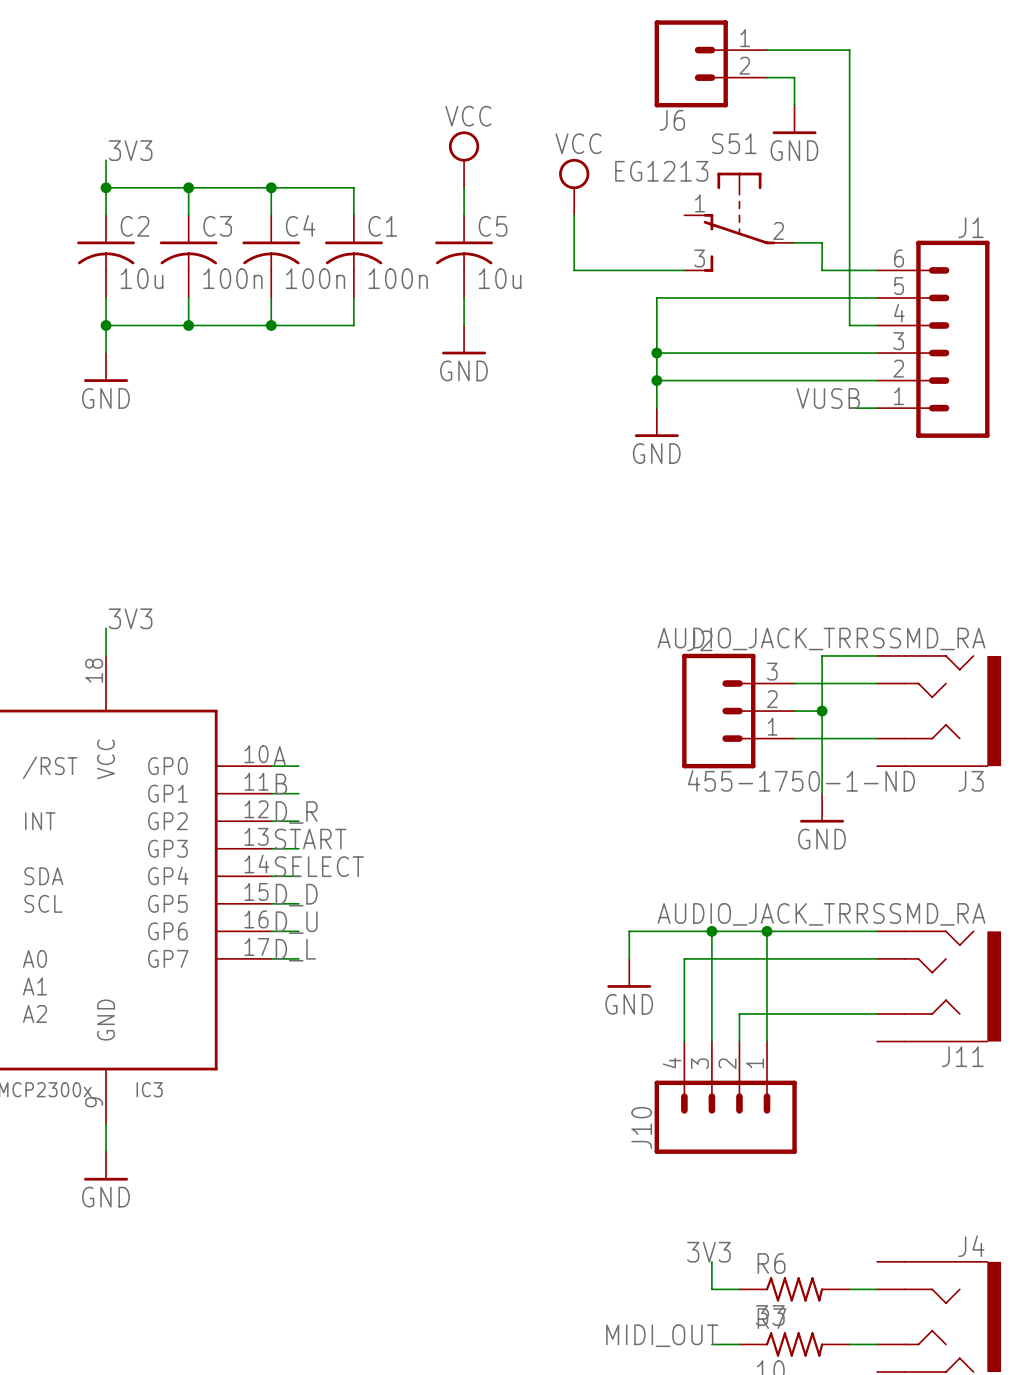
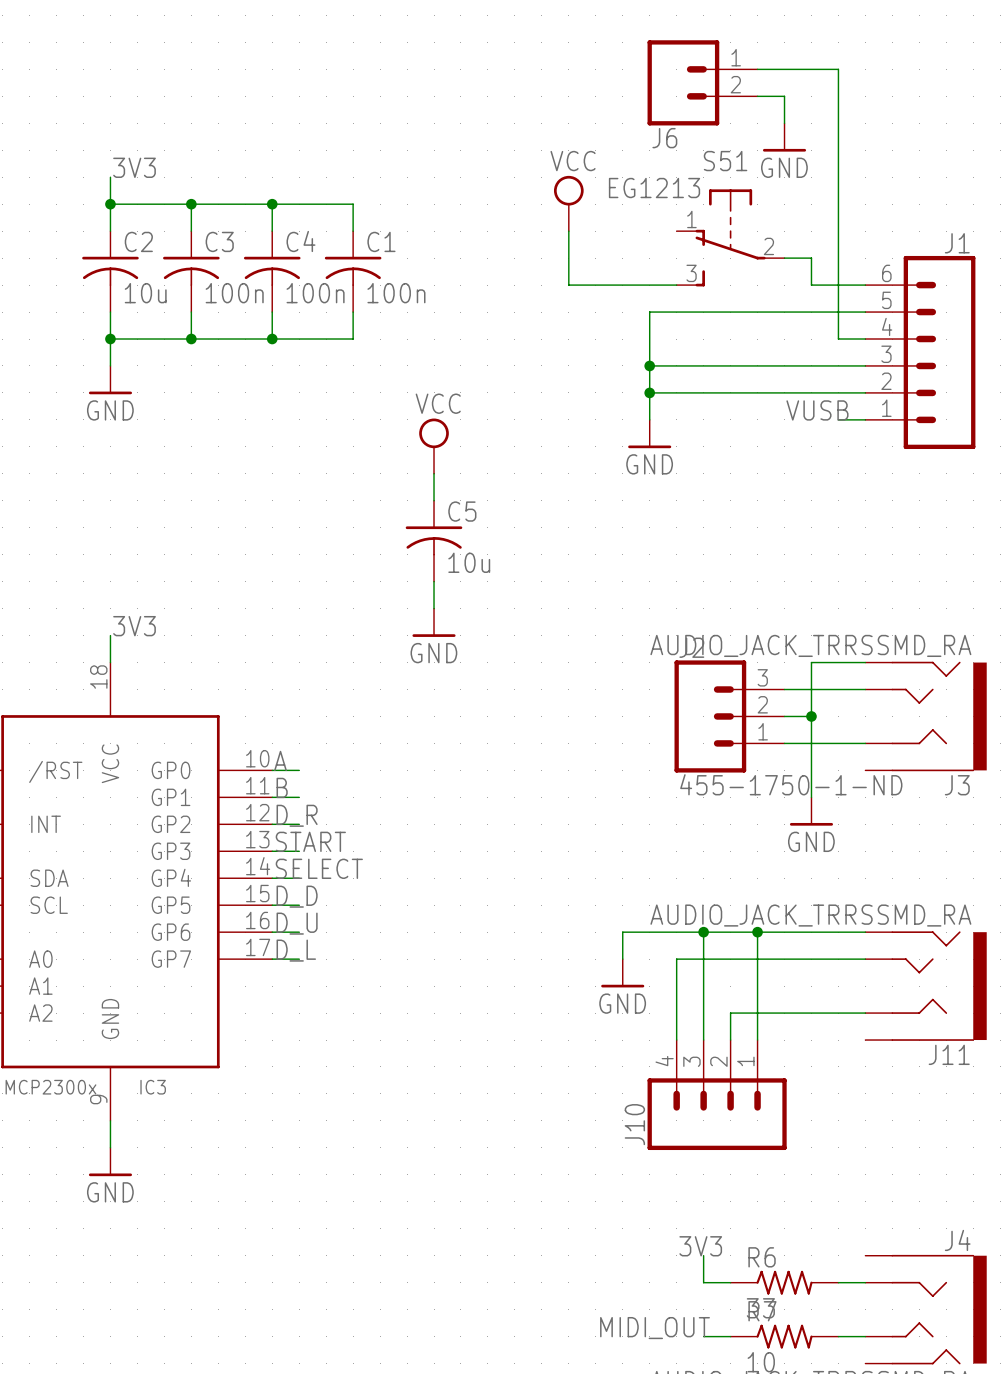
power symbol: VCC (464, 159) -> none
wire: (464, 187) (464, 215) -> none
C5 position: (464, 256) -> (434, 541)
wire: (464, 297) (464, 325) -> (434, 473) (434, 500)
power symbol: GND (464, 339) -> none
power symbol: none -> VCC (434, 446)
wire: none -> (434, 581) (434, 608)
power symbol: none -> GND (434, 622)

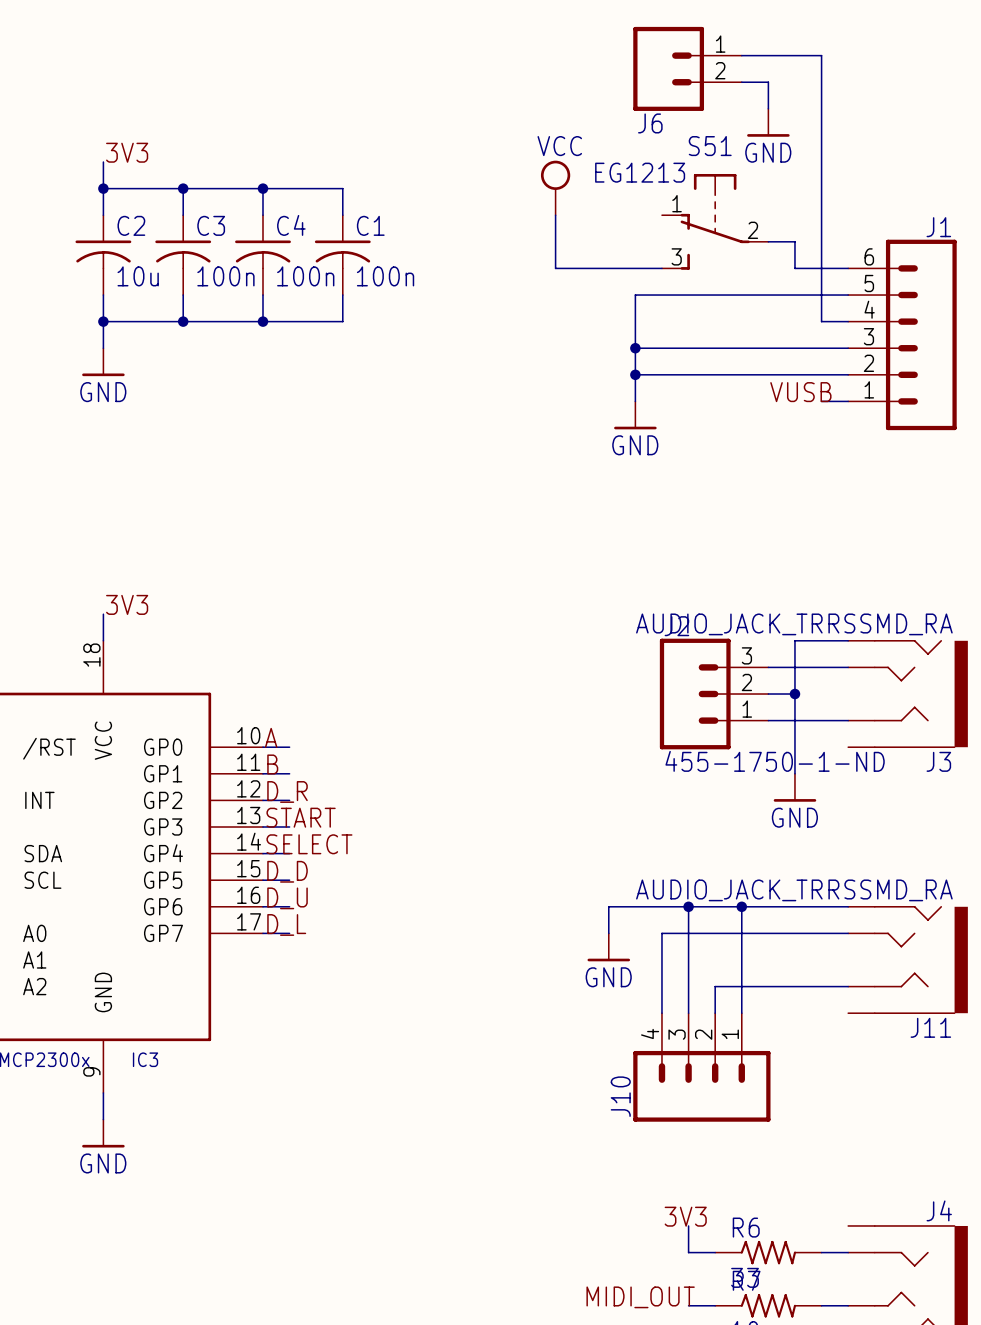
power symbol: VCC (434, 446) -> none
wire: (434, 473) (434, 500) -> none
C5: 10u (434, 541) -> none
wire: (434, 581) (434, 608) -> none
power symbol: GND (434, 622) -> none

